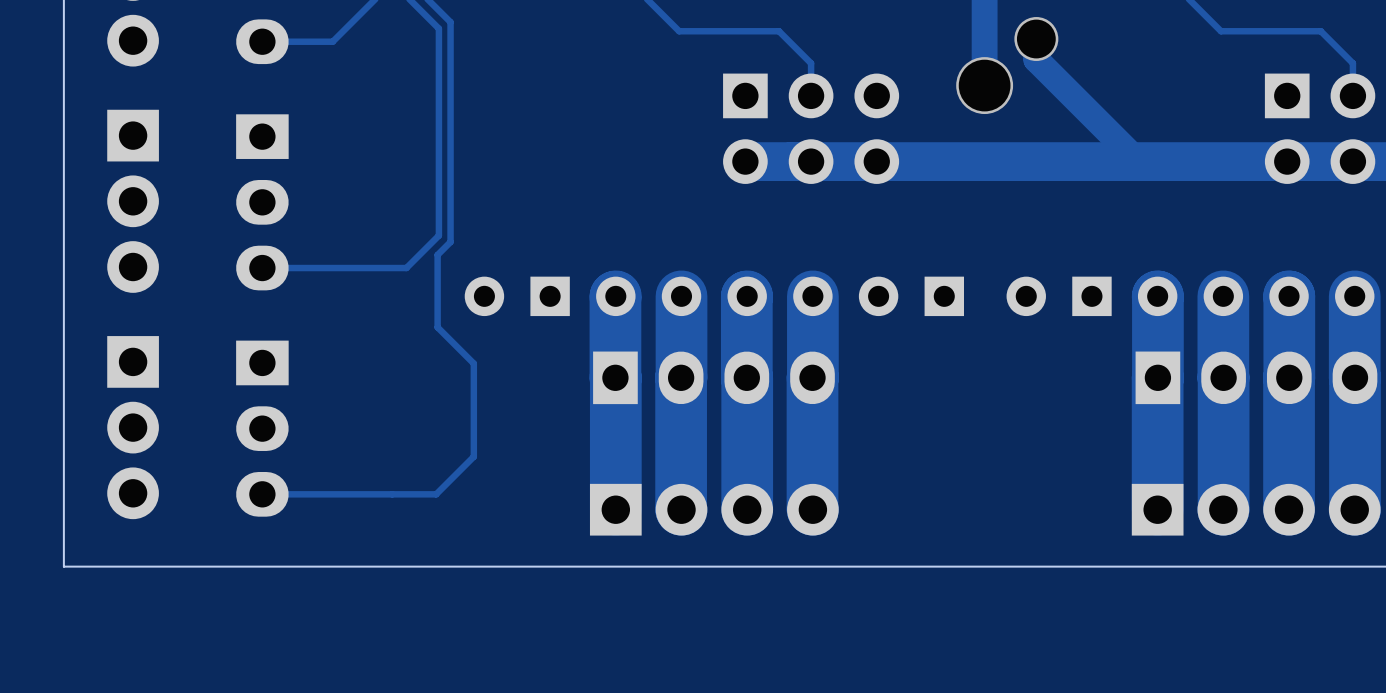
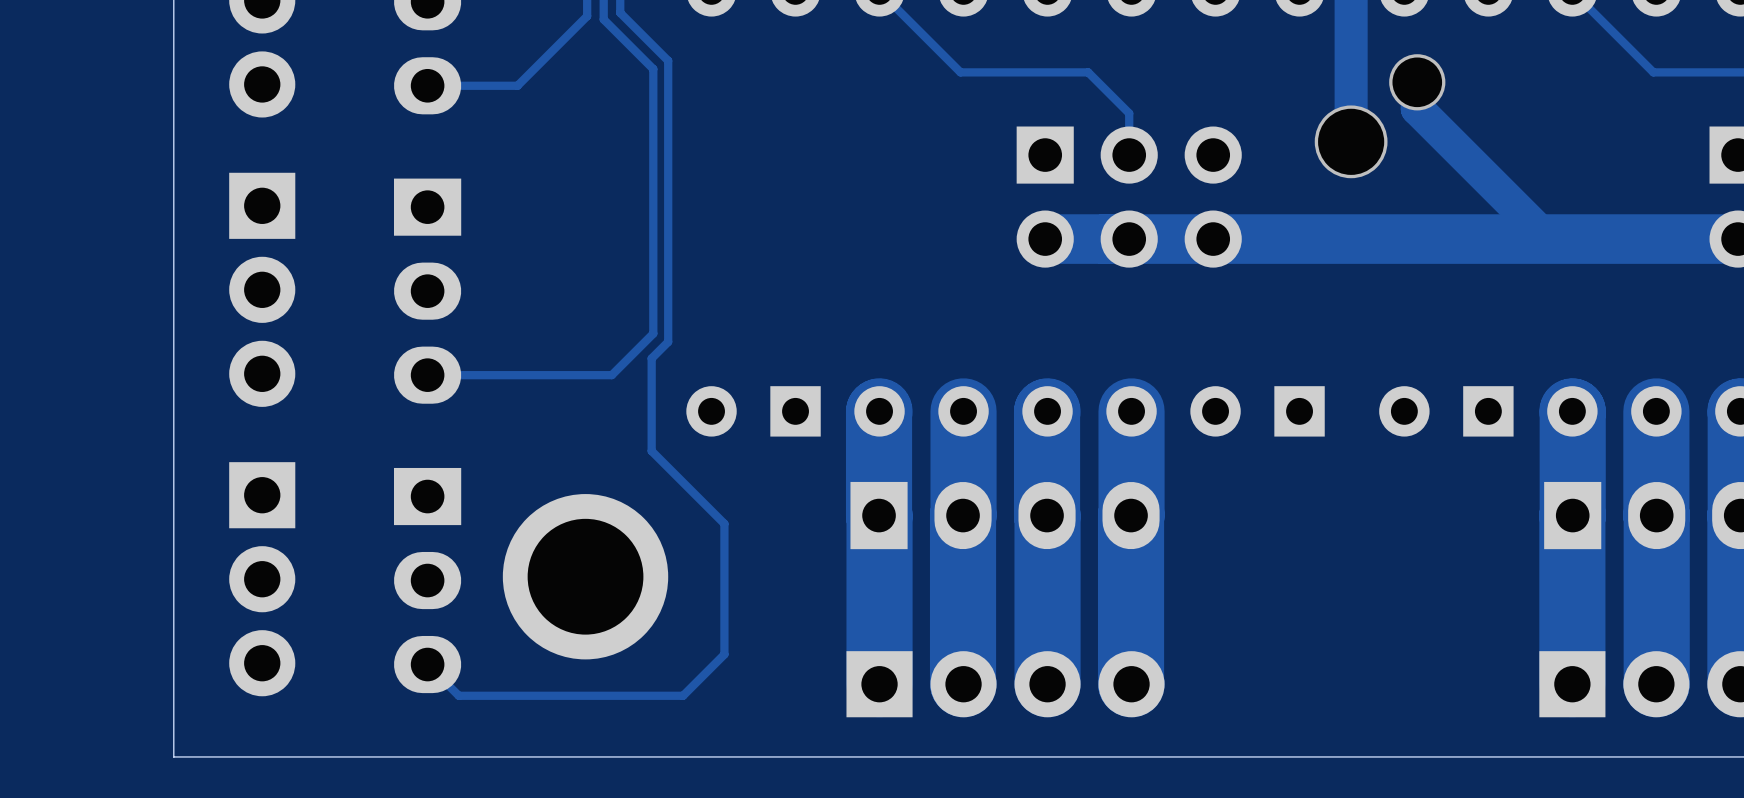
track: (473, 363) (473, 456) (436, 494) (262, 494) -> (697, 497) (724, 523) (724, 654) (683, 695) (458, 695) (427, 664)
part: none -> (585, 576)

